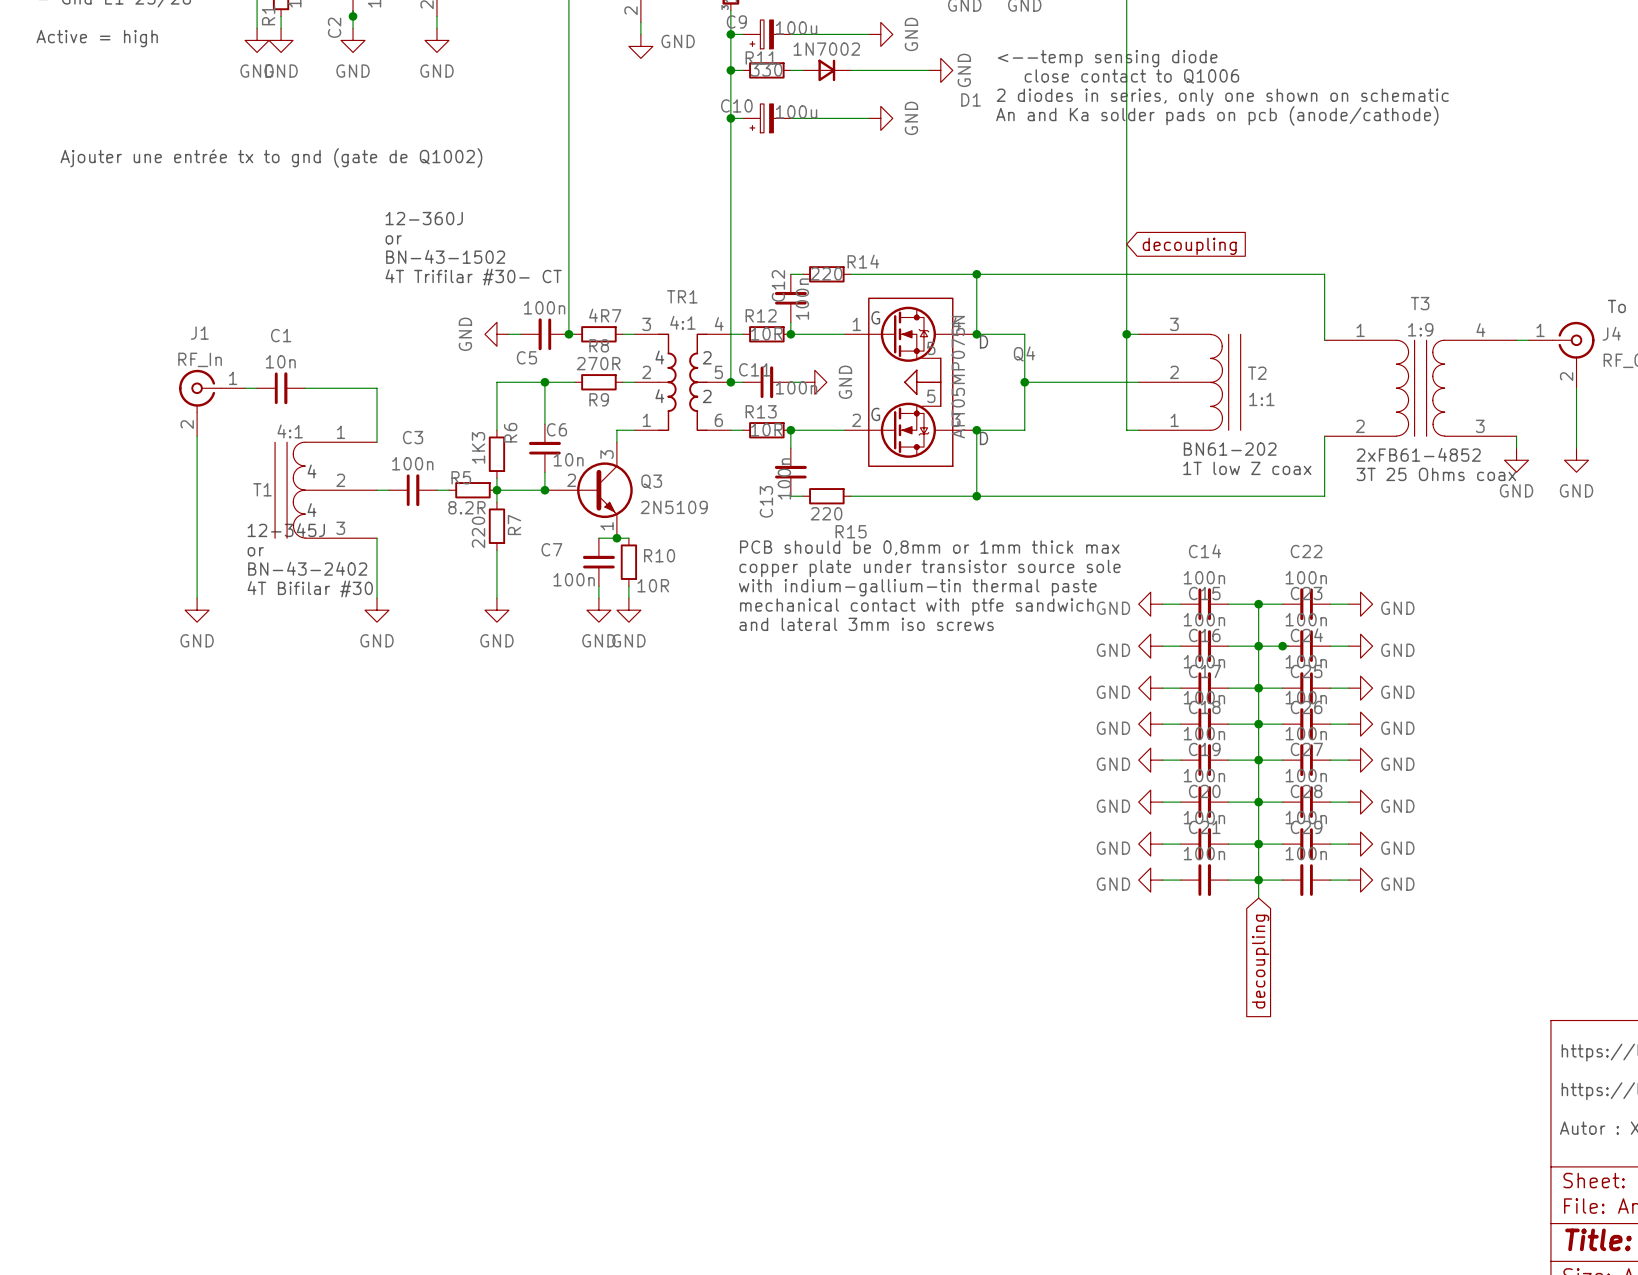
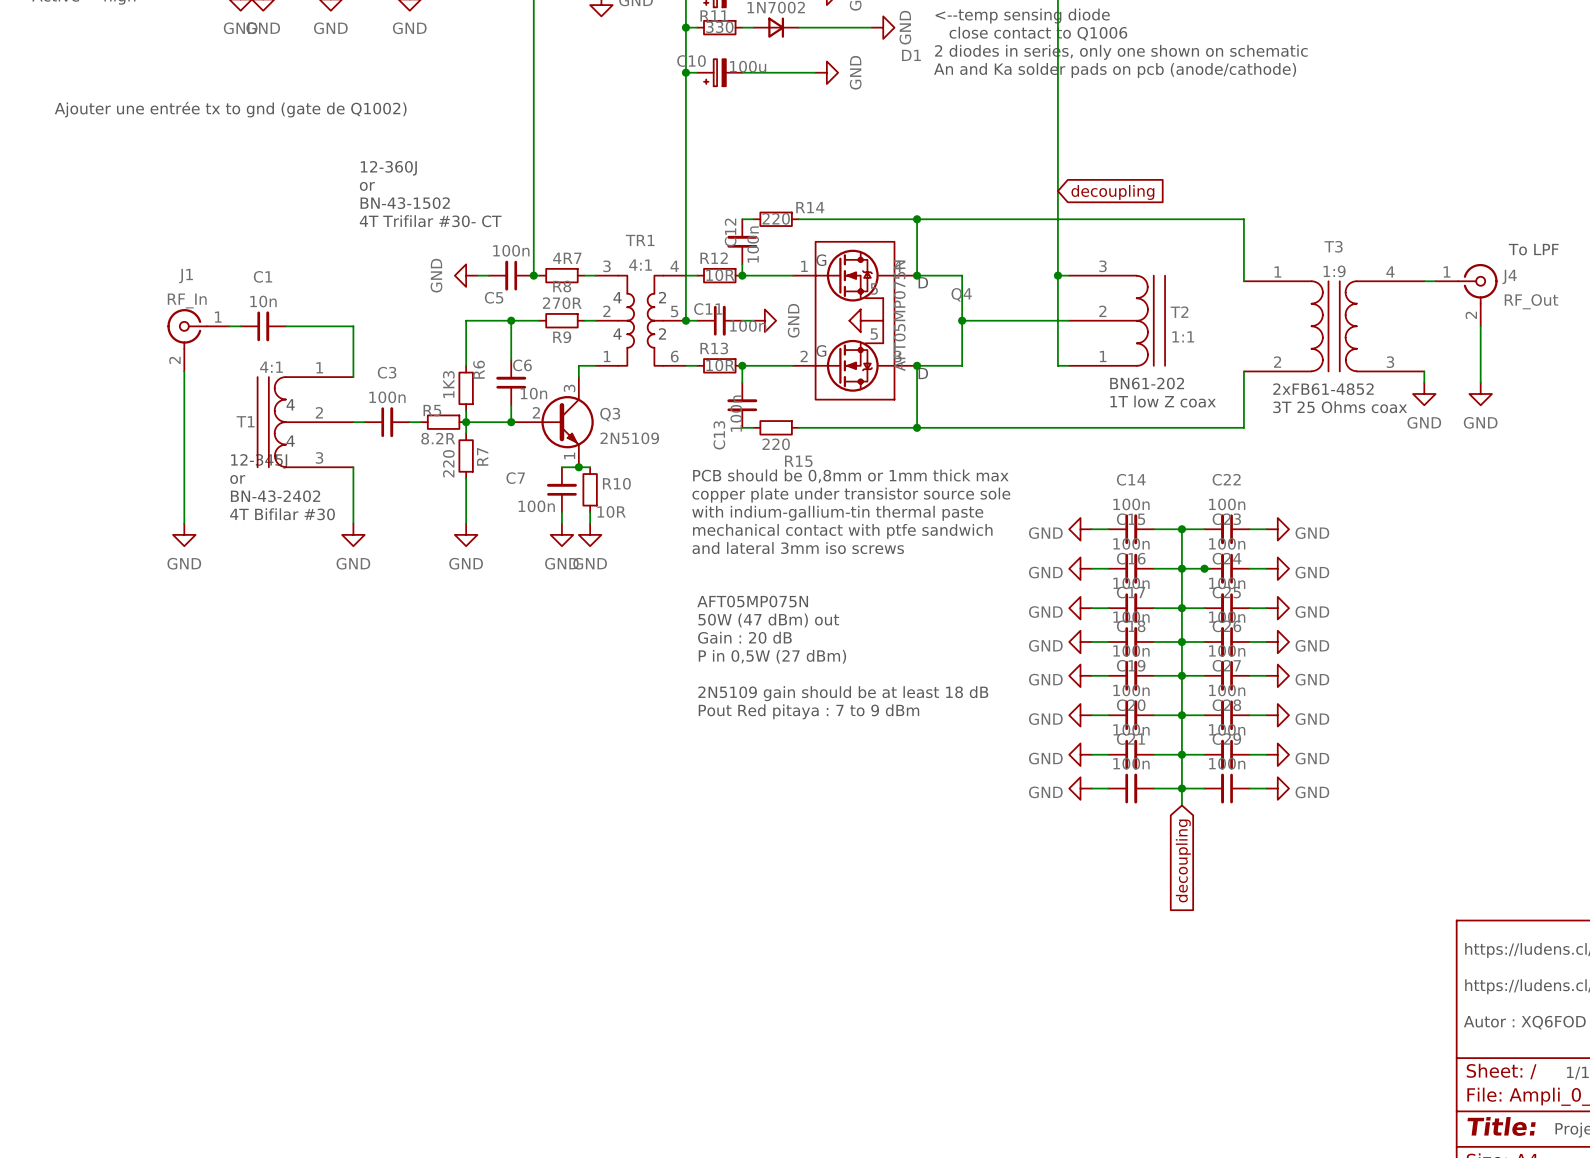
text: none -> AFT05MP075N (752, 601)
text: none -> 50W (47 dBm) out (768, 620)
text: none -> Gain : 20 dB (744, 637)
text: none -> P in 0,5W (27 dBm) (772, 656)
text: none -> 2N5109 gain should be at least 18 dB (843, 693)
text: none -> Pout Red pitaya : 7 to 9 dBm (808, 711)

